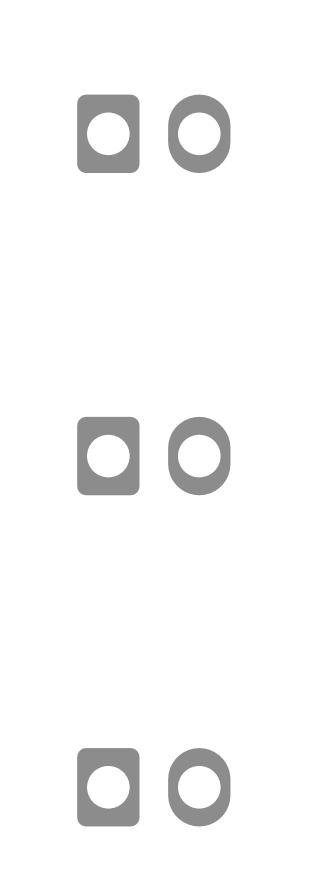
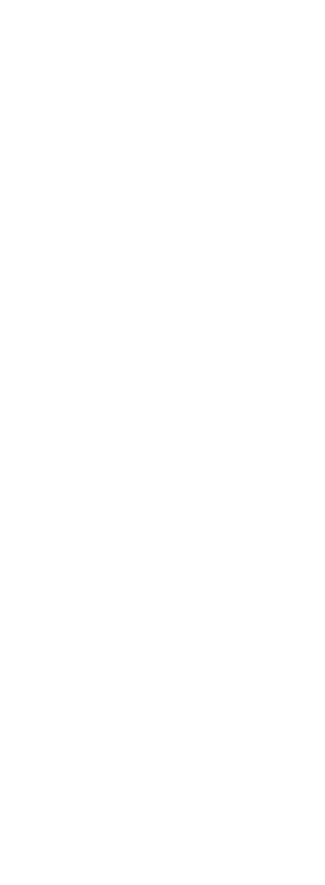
part: (153, 133) -> none
part: (153, 456) -> none
part: (153, 787) -> none

